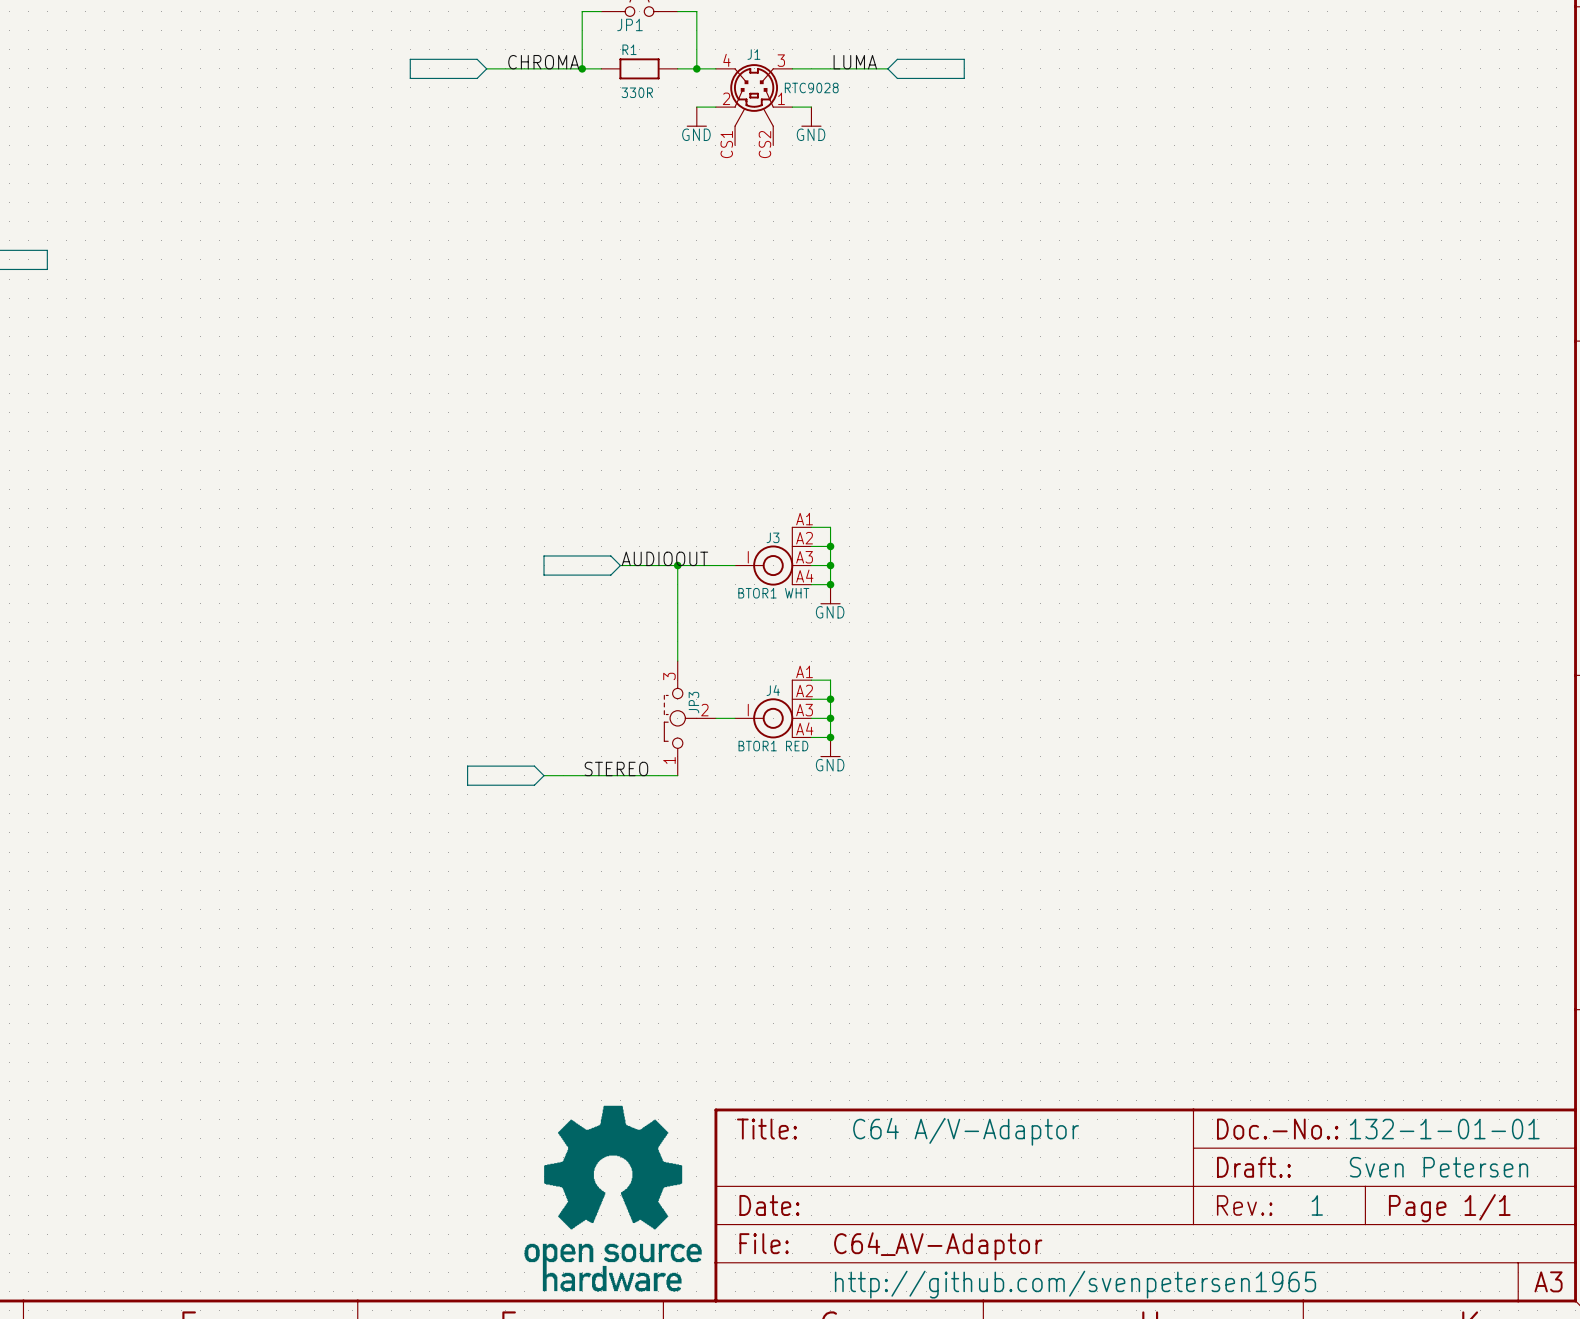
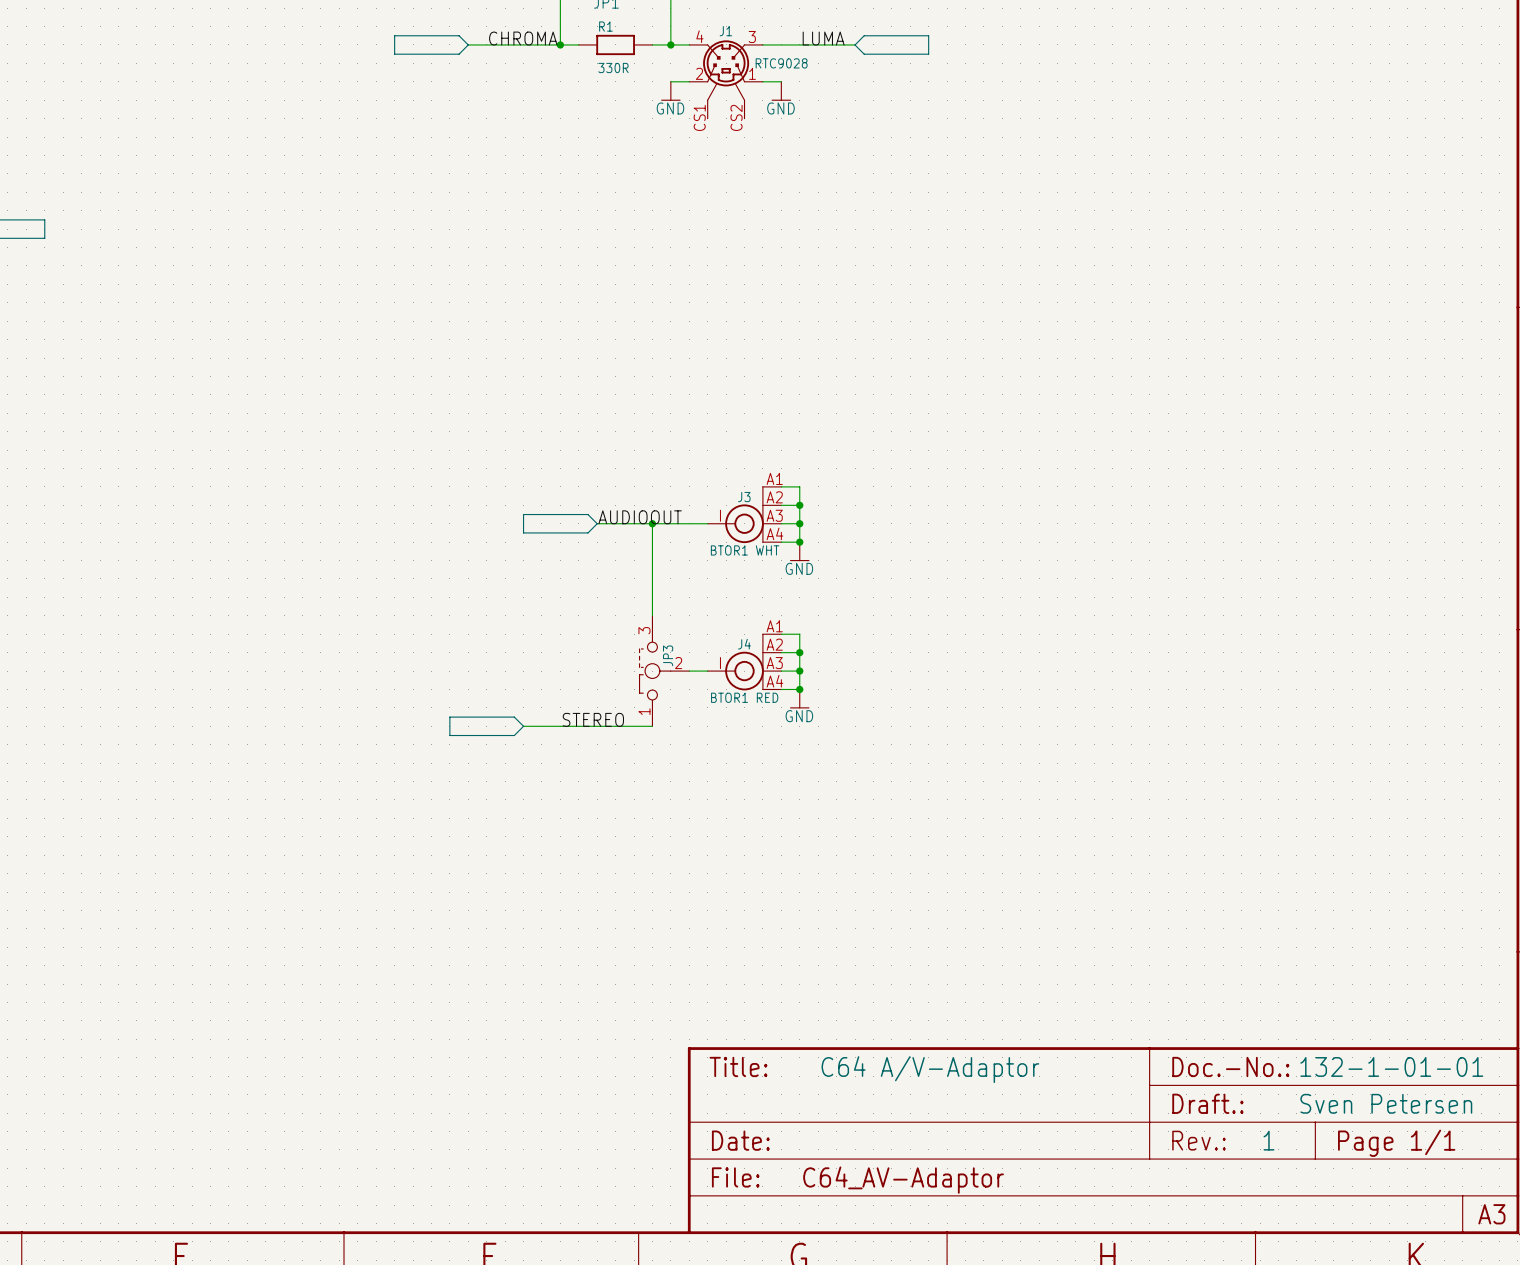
part: (613, 1198) -> none
text: http://github.com/svenpetersen1965 (1075, 1284) -> none

